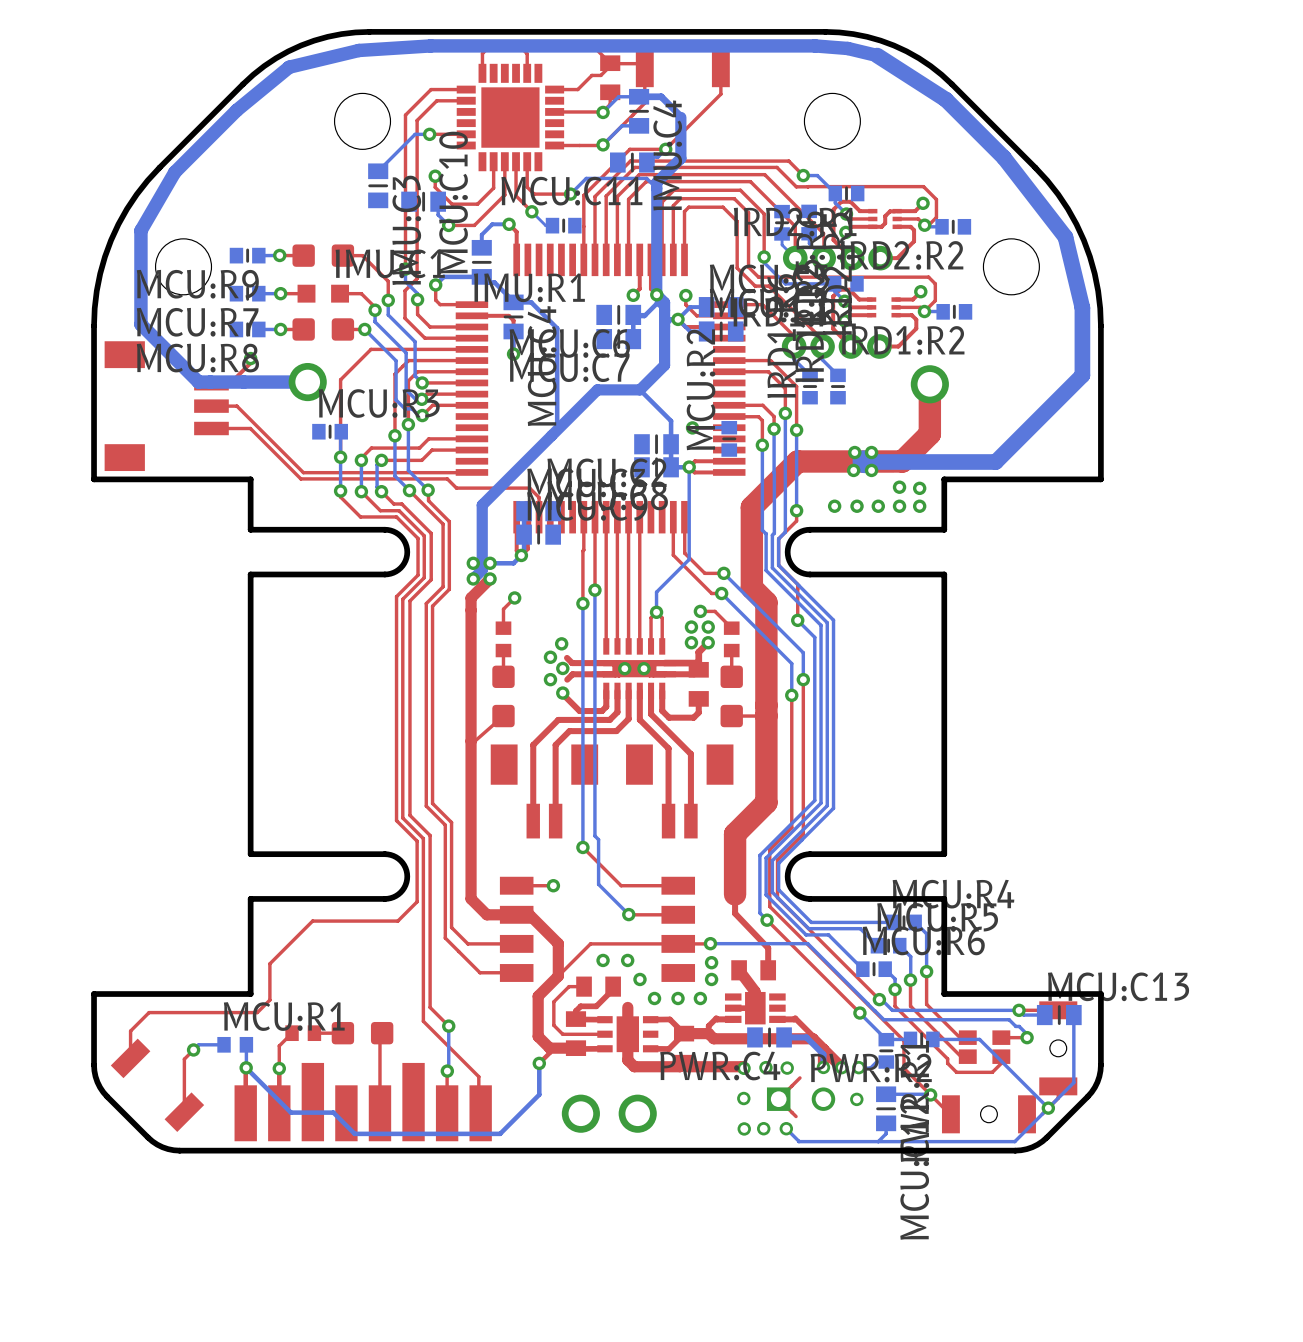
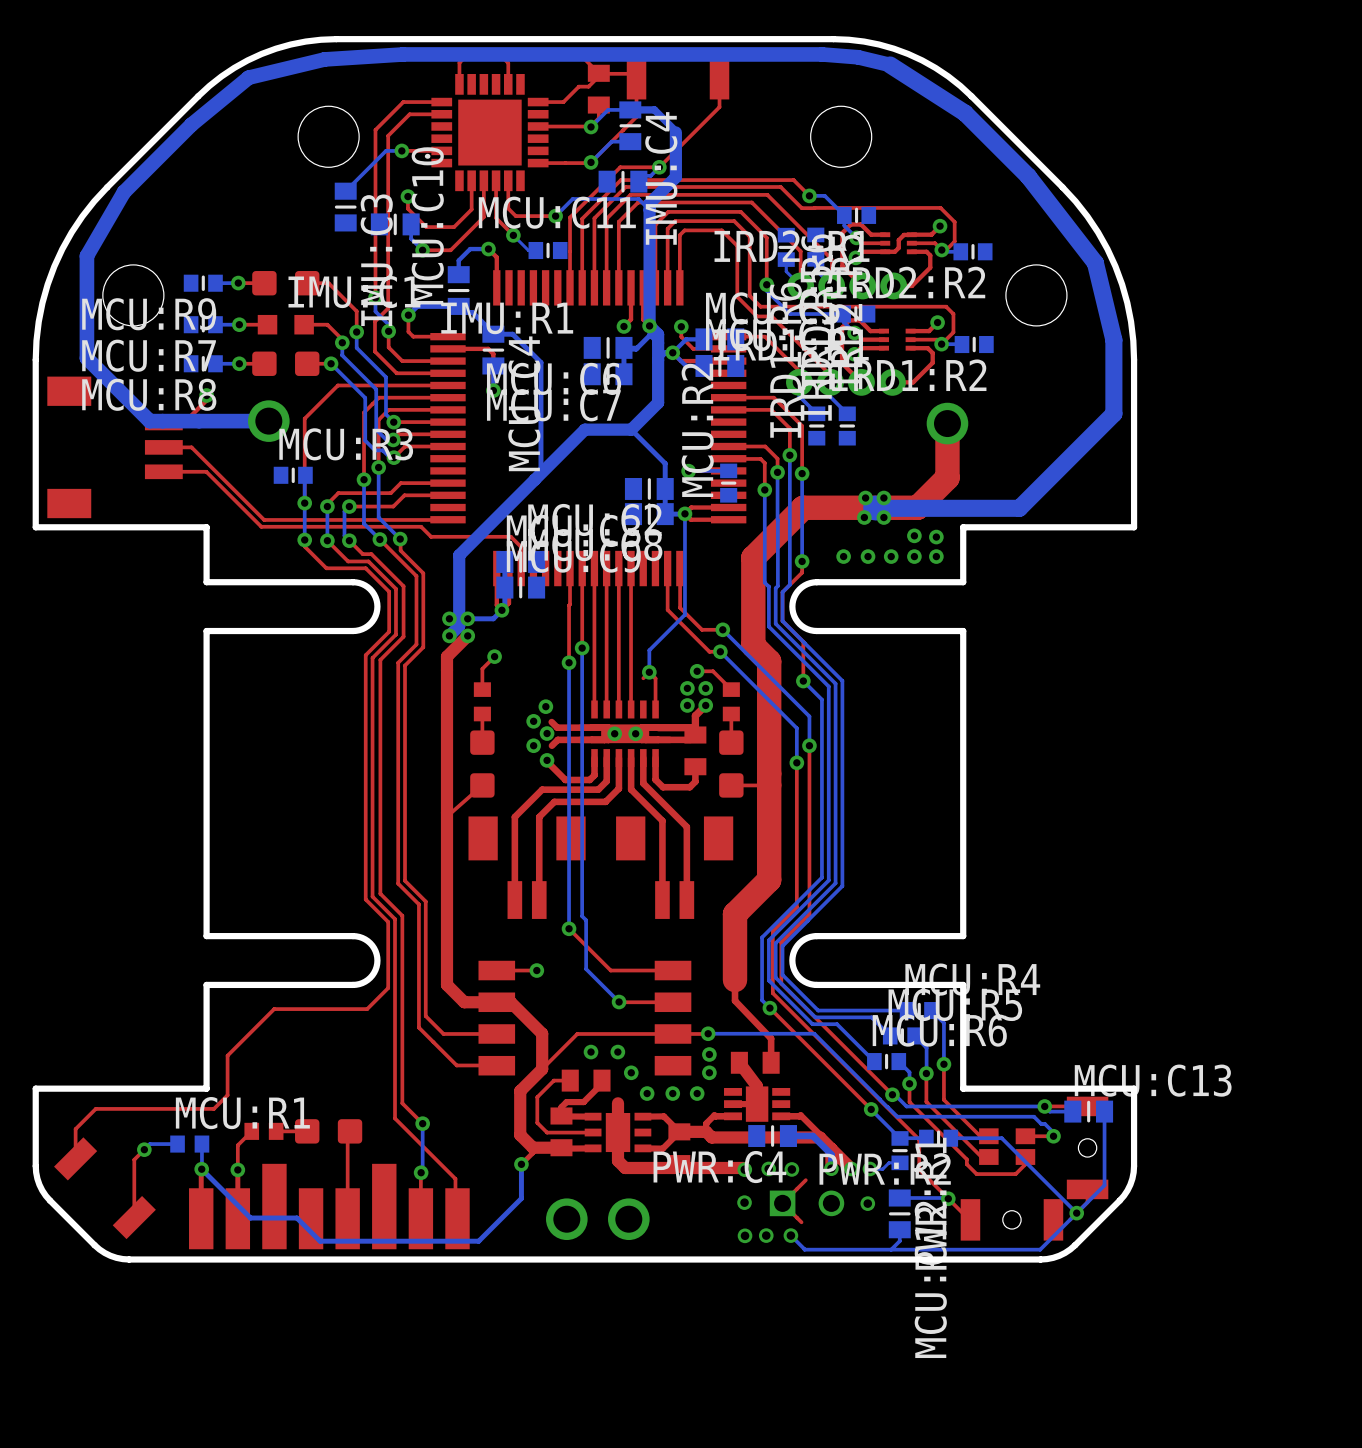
top track: (651, 617) (651, 646) -> none

